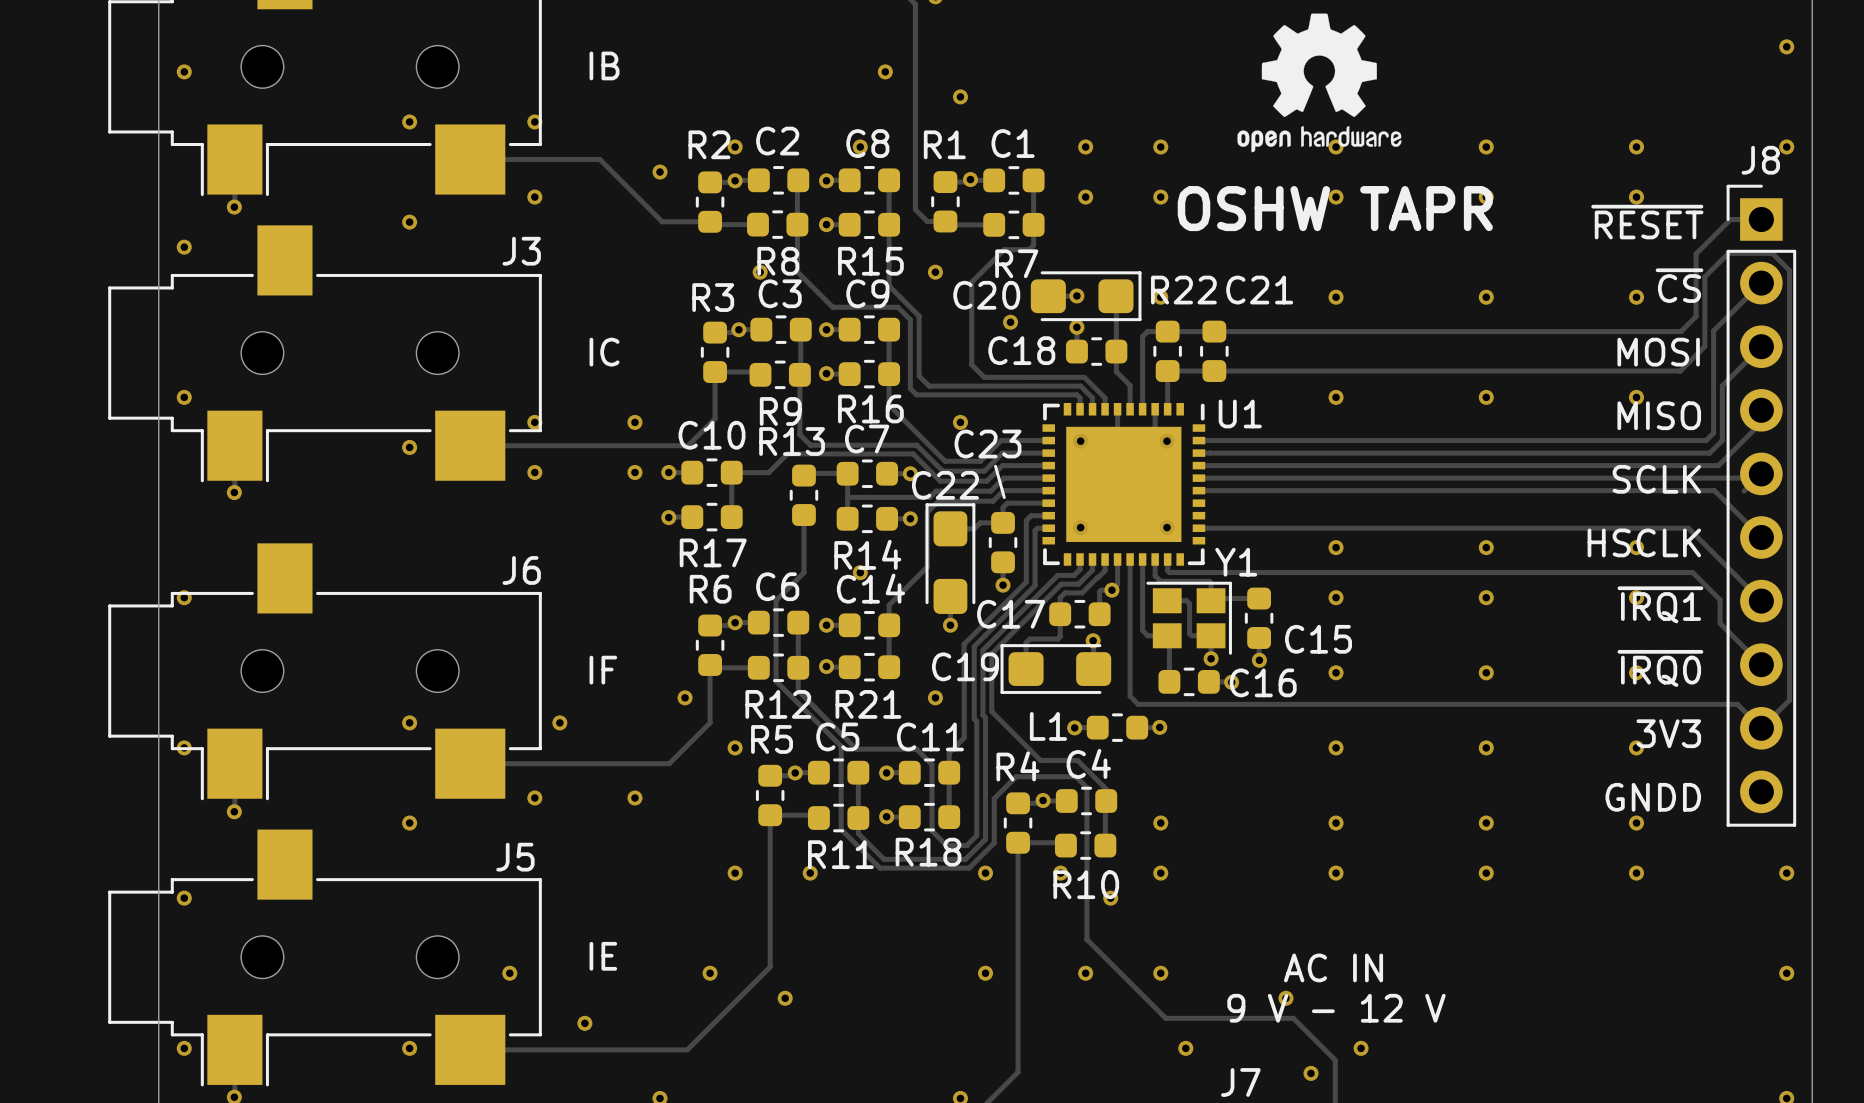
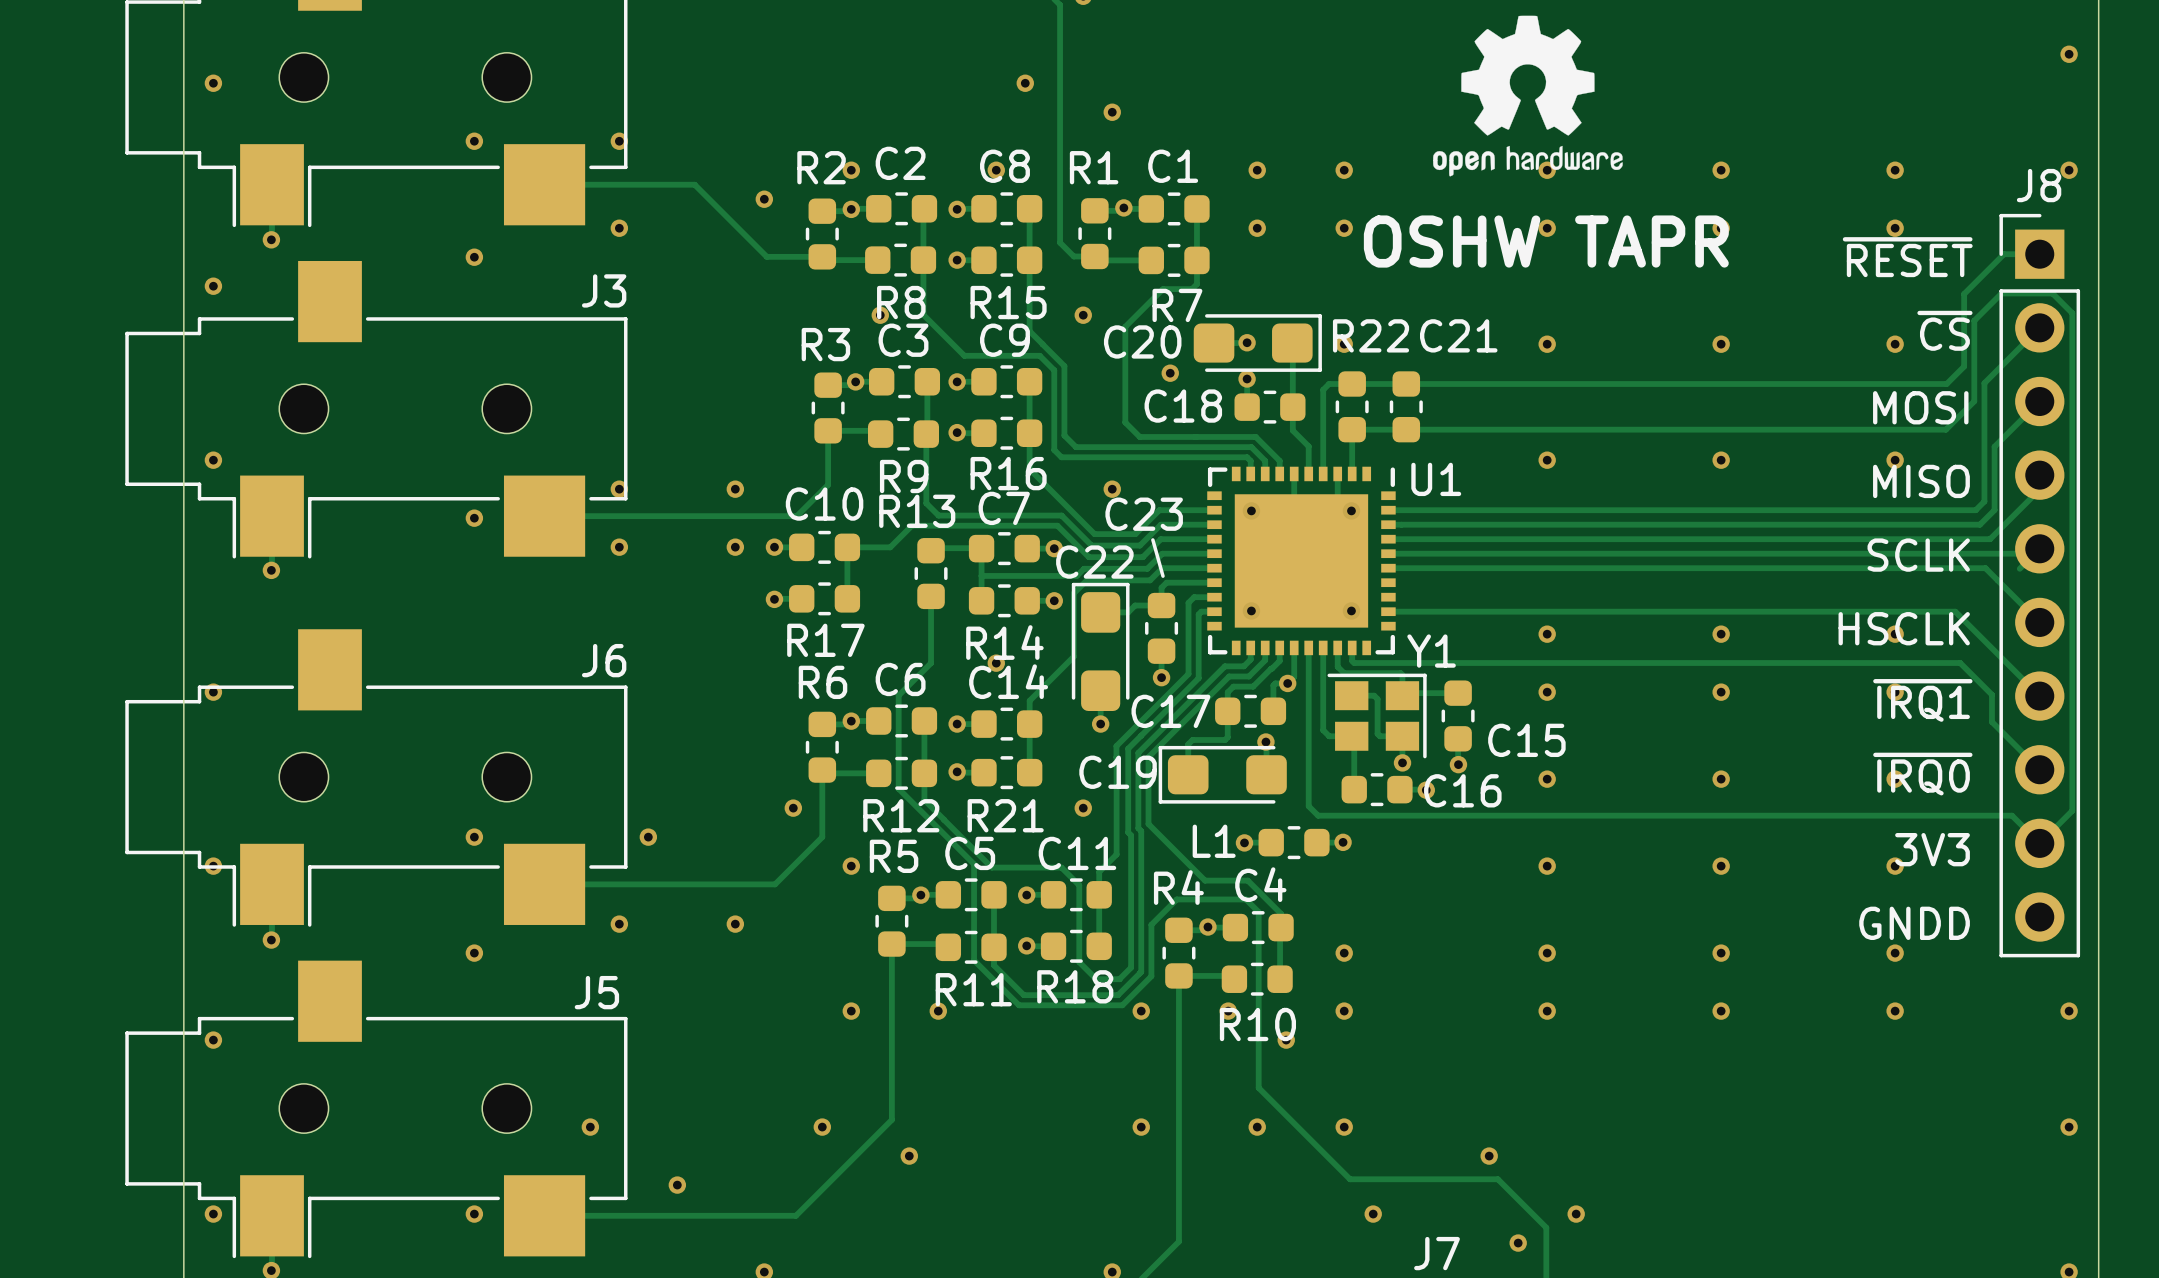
text: IB (604, 65) -> none
text: IC (604, 352) -> none
text: IF (603, 670) -> none
text: IE (603, 956) -> none
text: AC IN (1333, 967) -> none
text: 9 V - 12 V (1336, 1008) -> none

